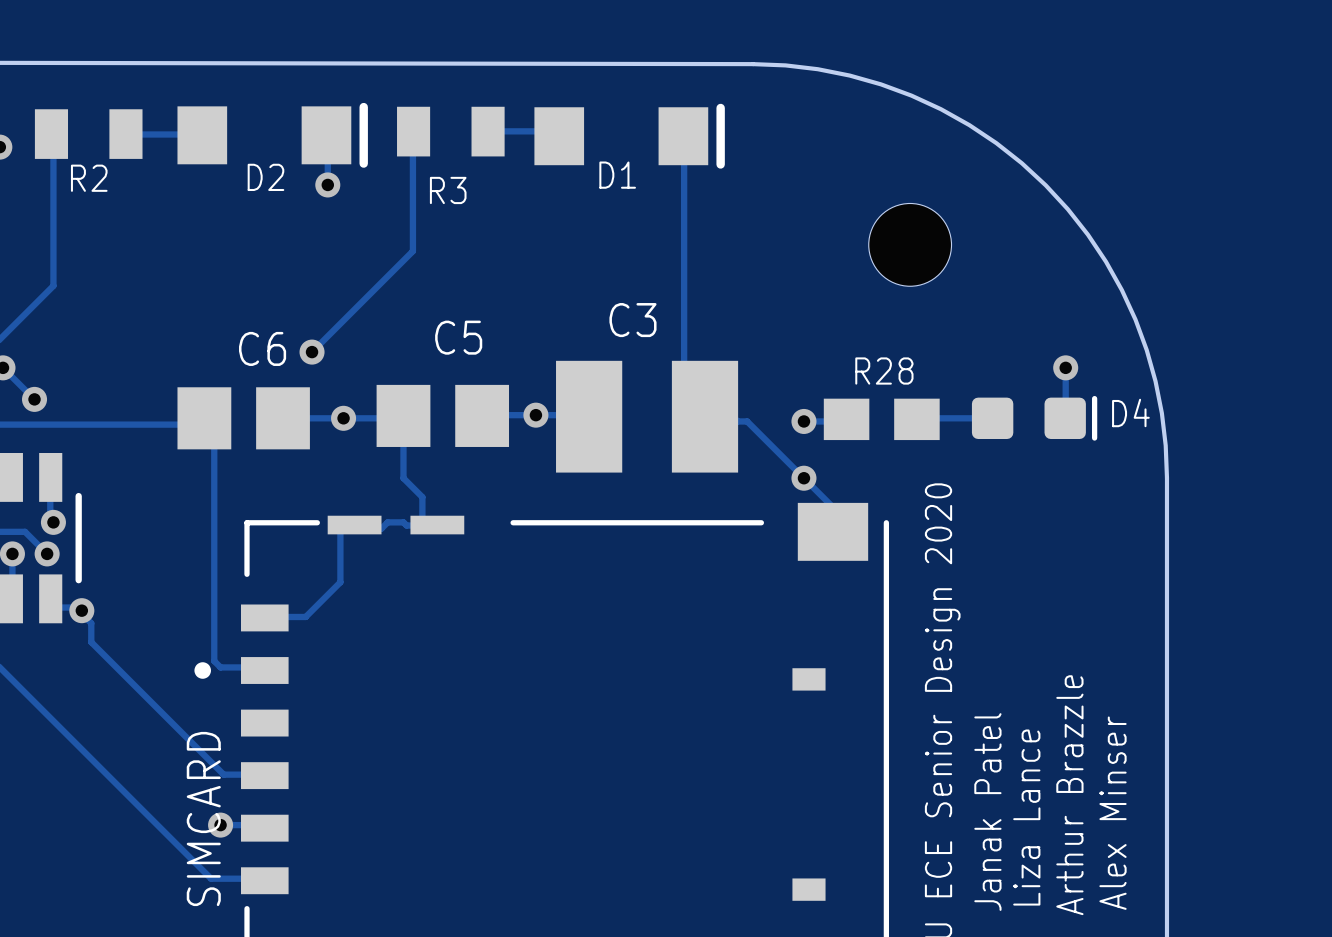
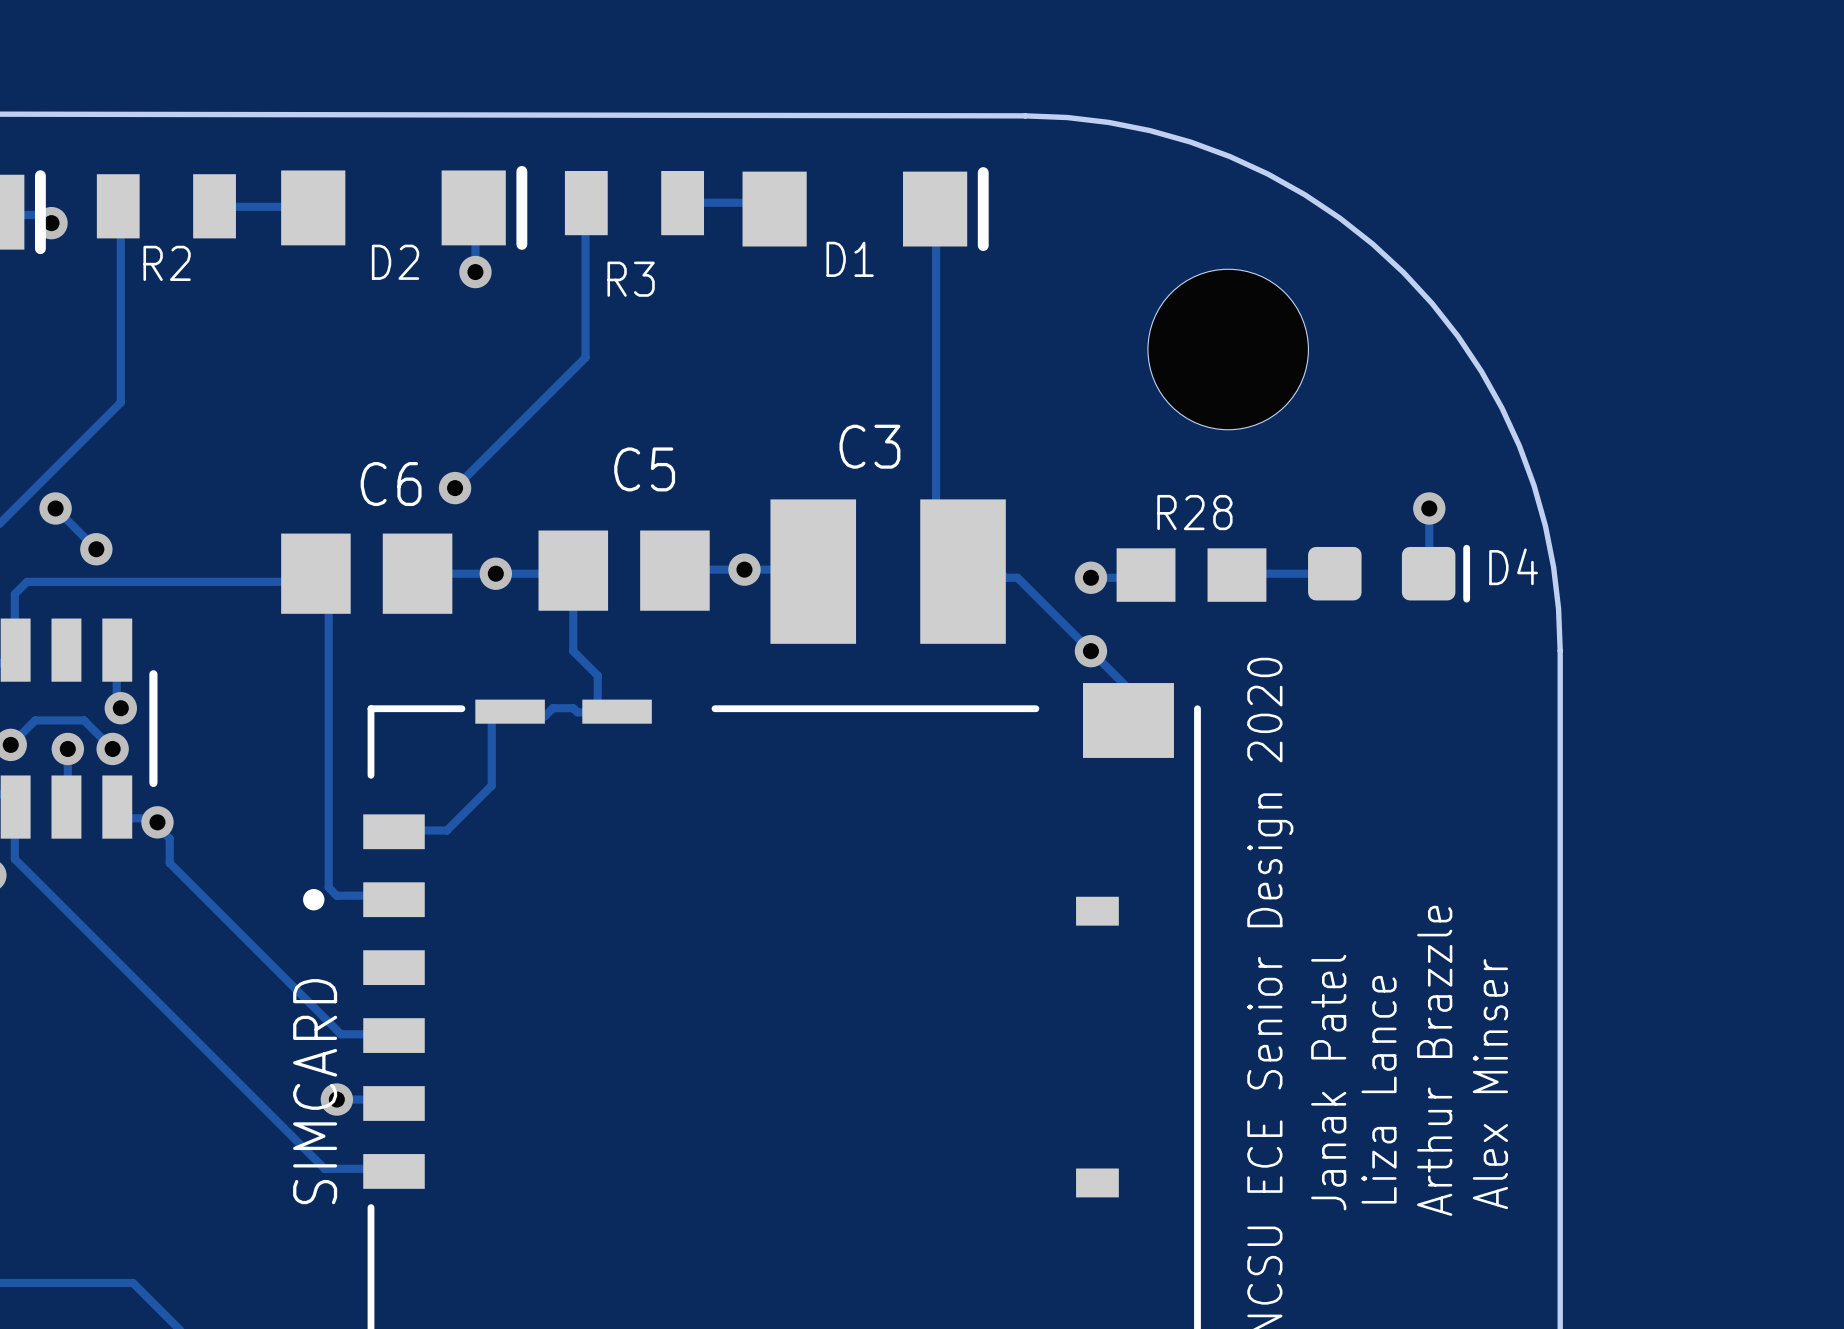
hole size: [868, 203, 952, 287] -> [1147, 269, 1309, 430]

